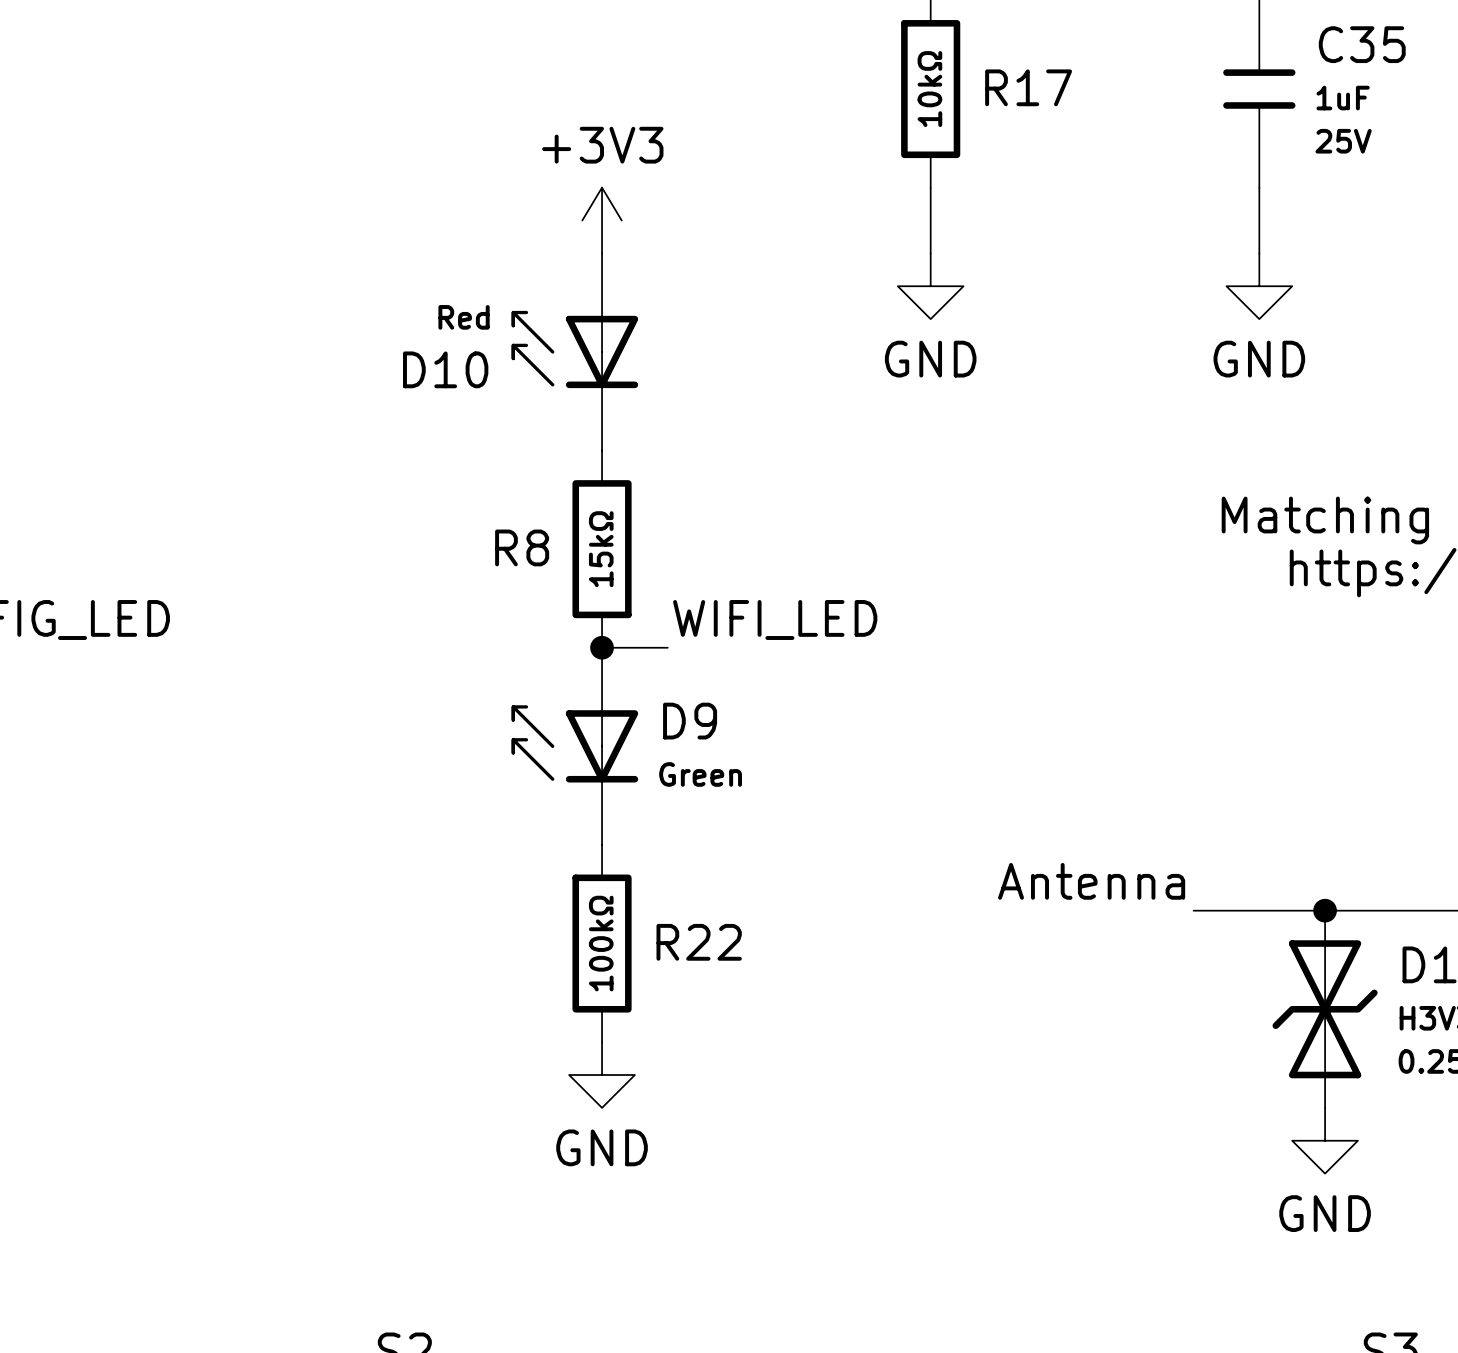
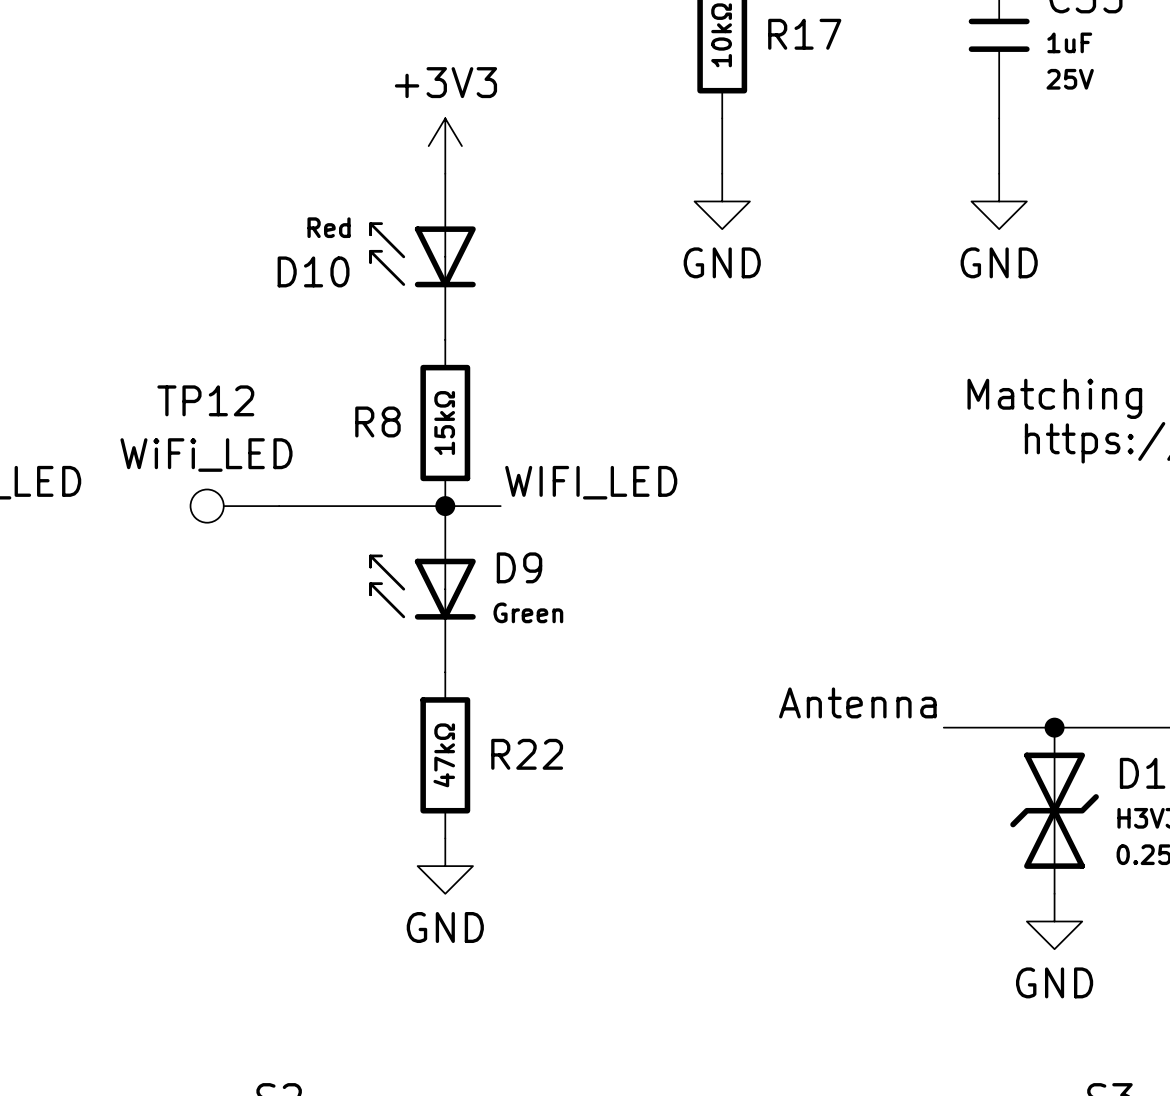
TP12: none -> WiFi_LED (234, 506)
wire: none -> (279, 506) (445, 506)
R22 value: 100kΩ (601, 943) -> 47kΩ (444, 755)

